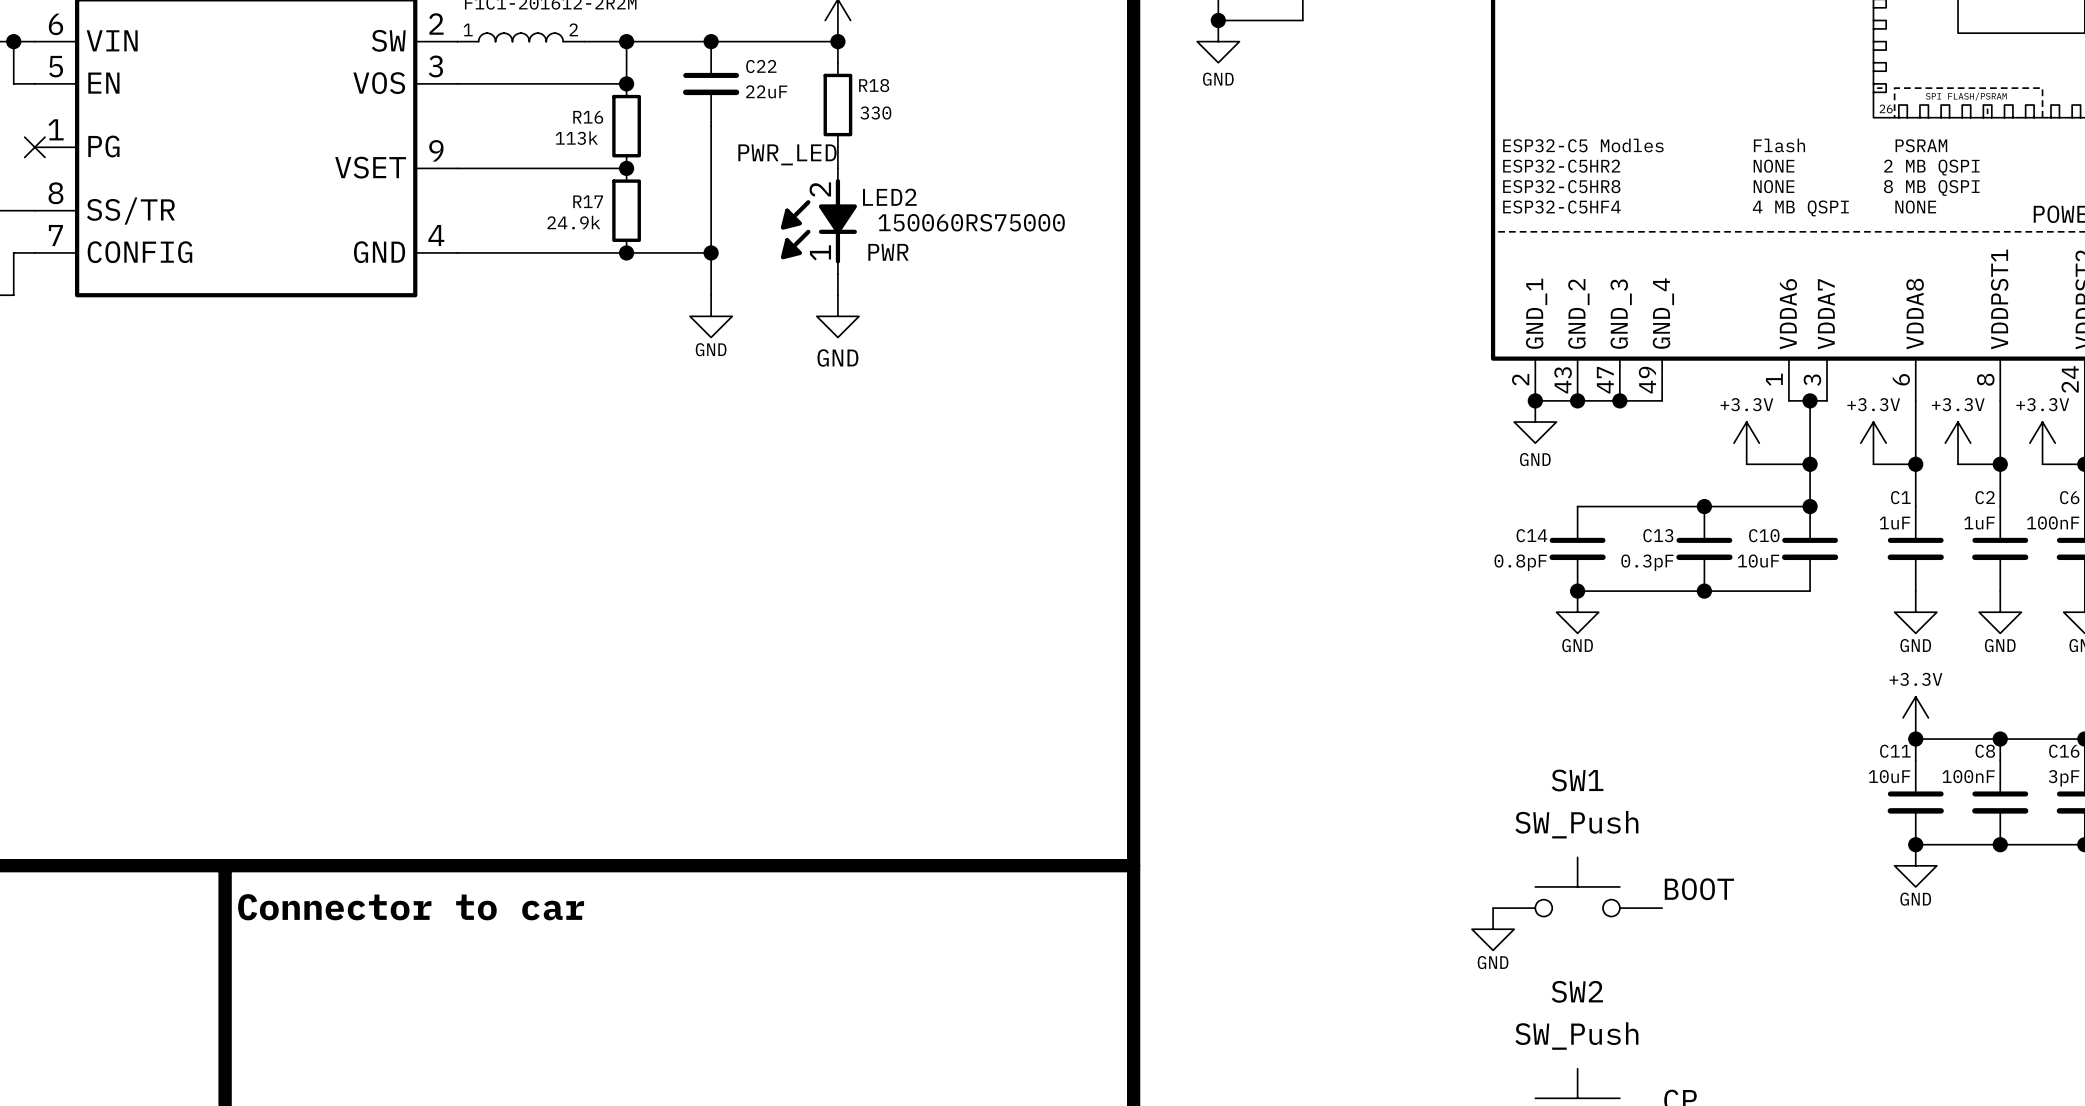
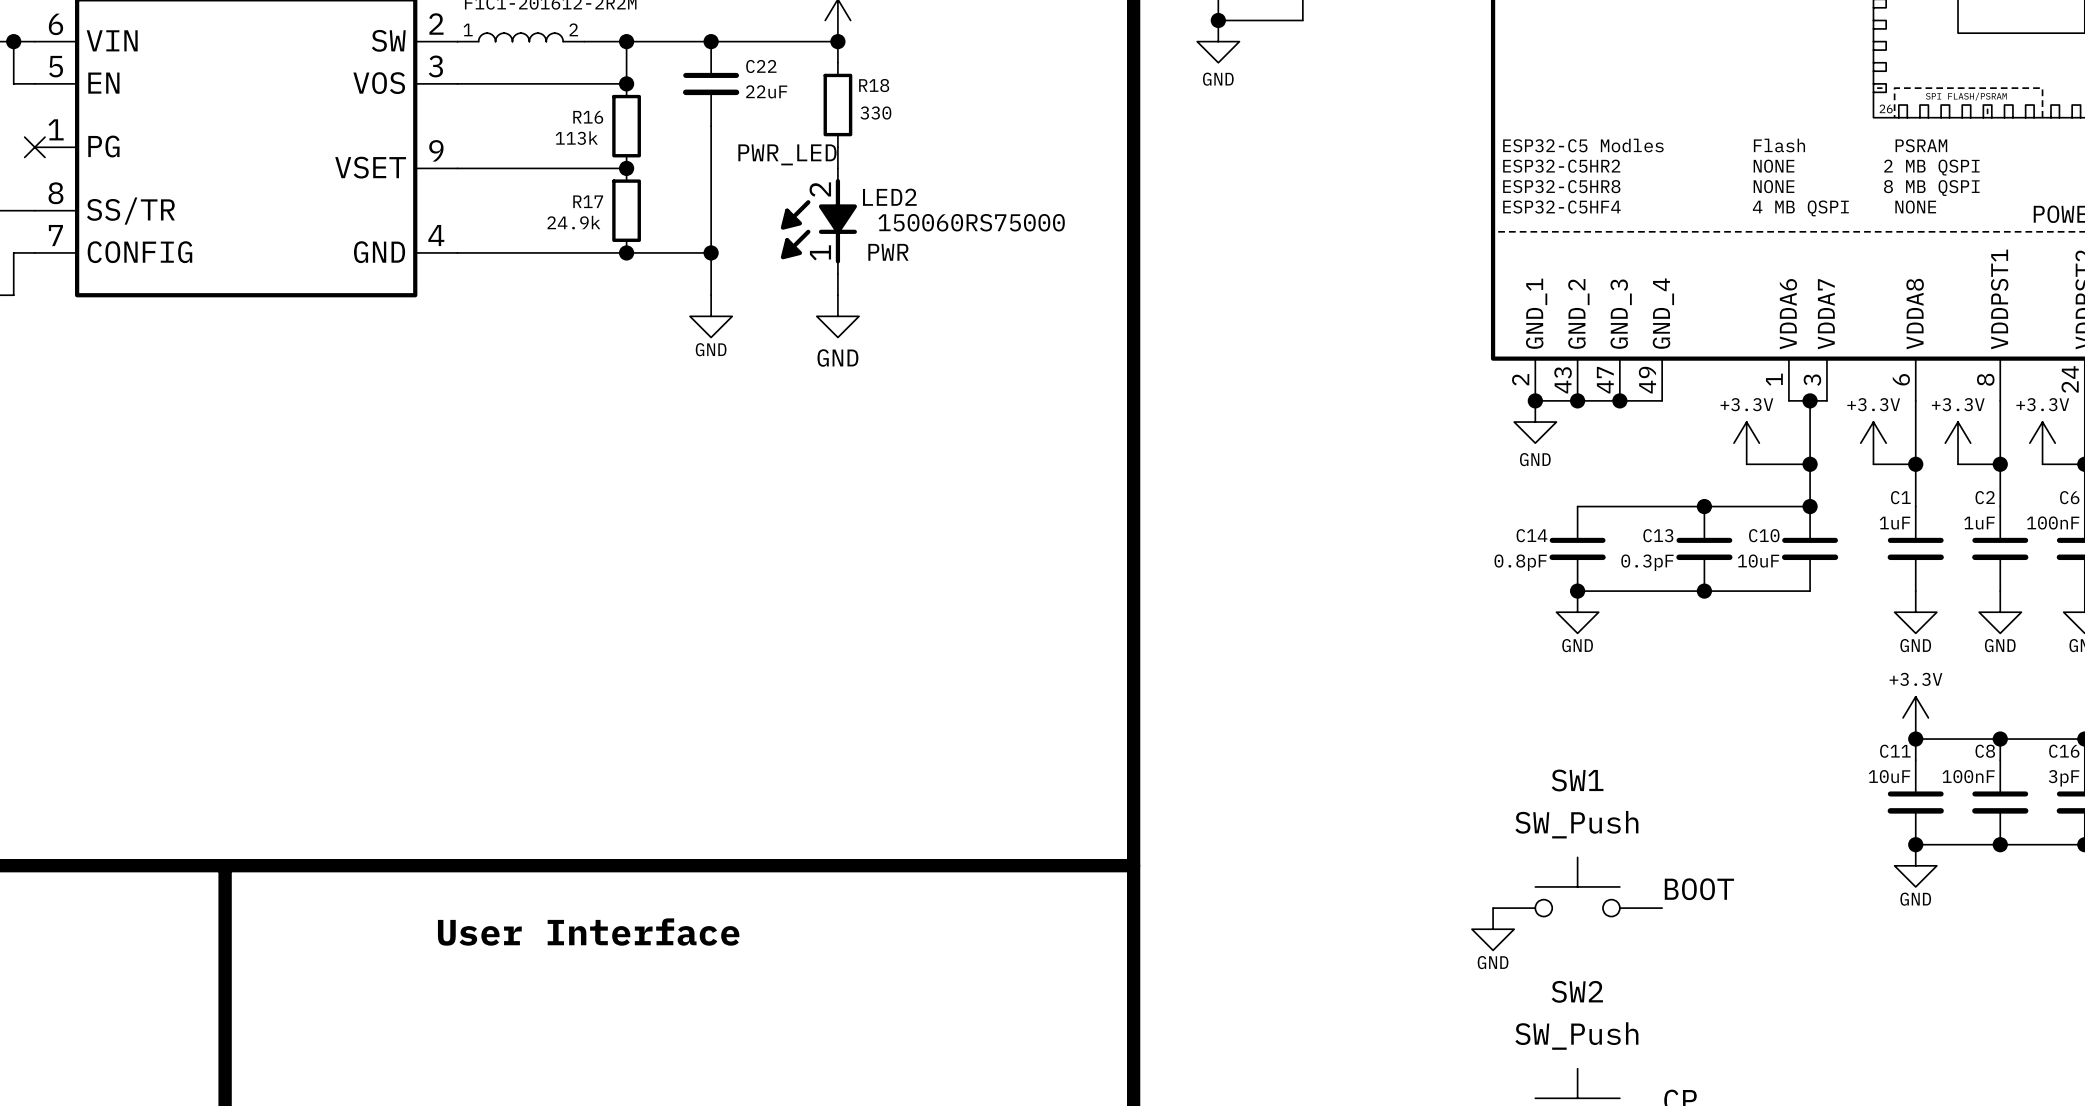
text: Connector to car (411, 907) -> none
text: none -> User Interface (588, 932)

